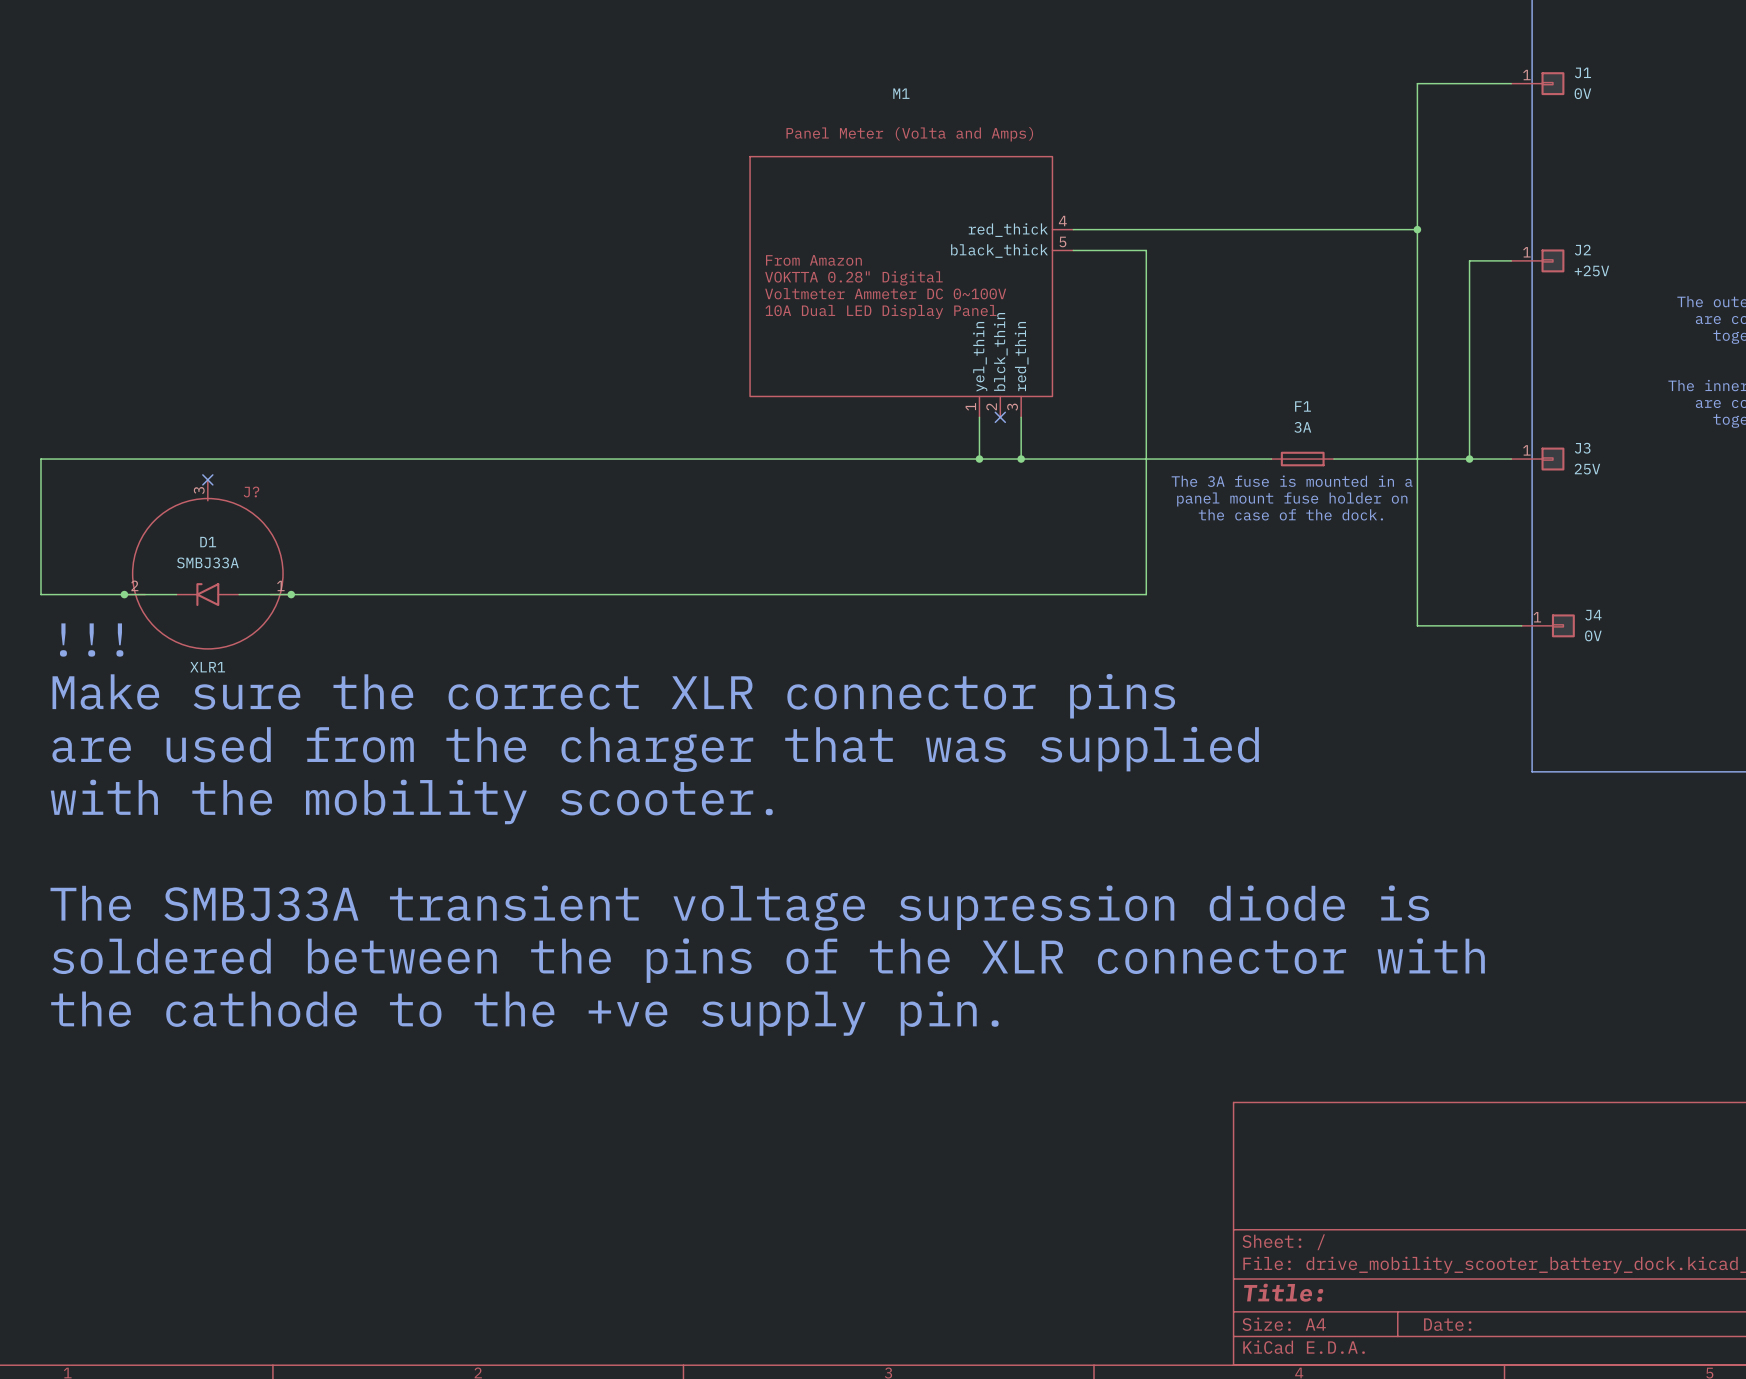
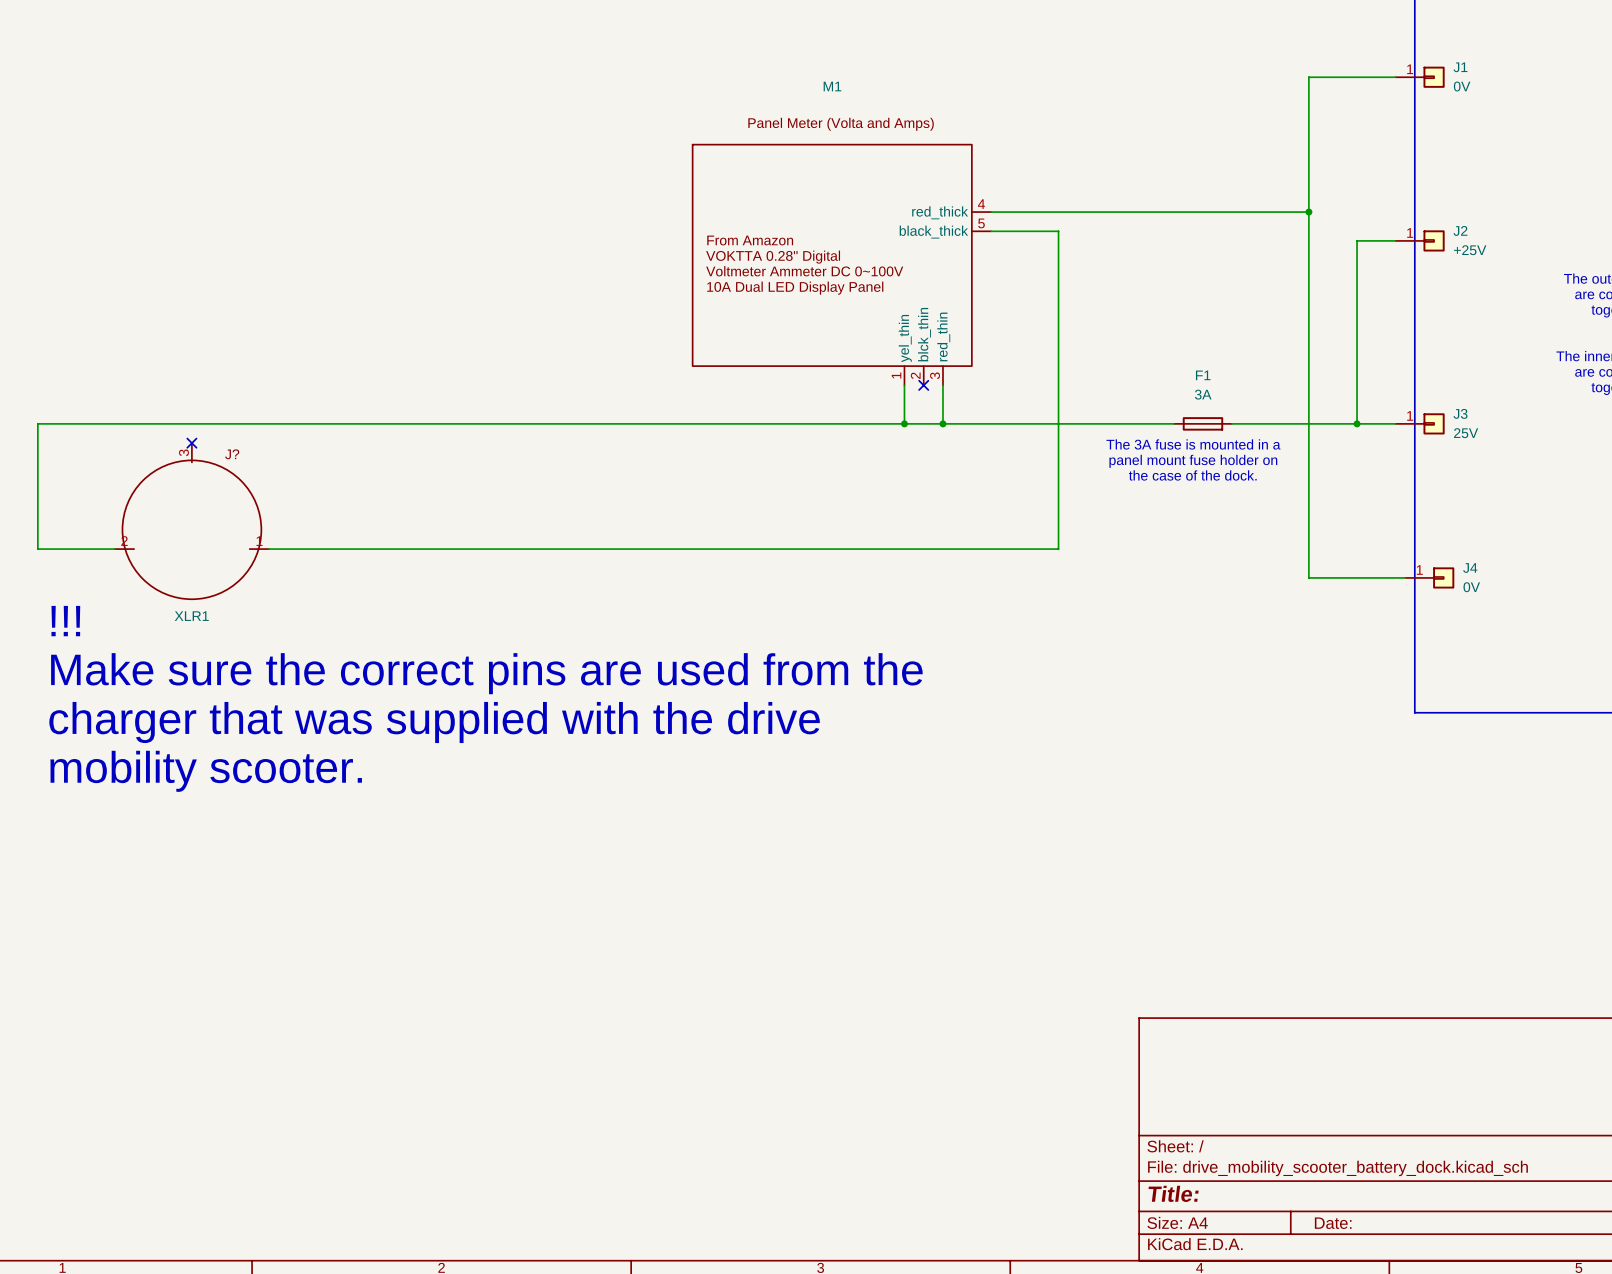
wire: (124, 594) (176, 594) -> none
junction: (124, 594) -> none
D1: SMBJ33A (207, 594) -> none
wire: (239, 594) (291, 594) -> none
junction: (291, 594) -> none
text position: !!! (91, 640) -> !!! (65, 621)
text: Make sure the correct XLR connector pins (613, 696) -> Make sure the correct pins are used from the (486, 673)
text: are used from the charger that was supplied (655, 749) -> charger that was supplied with the drive (434, 722)
text: with the mobility scooter. (411, 801) -> mobility scooter. (206, 771)
text: The SMBJ33A transient voltage supression diode is (739, 908) -> none
text: soldered between the pins of the XLR connector with (768, 960) -> none
text: the cathode to the +ve supply pin. (524, 1013) -> none

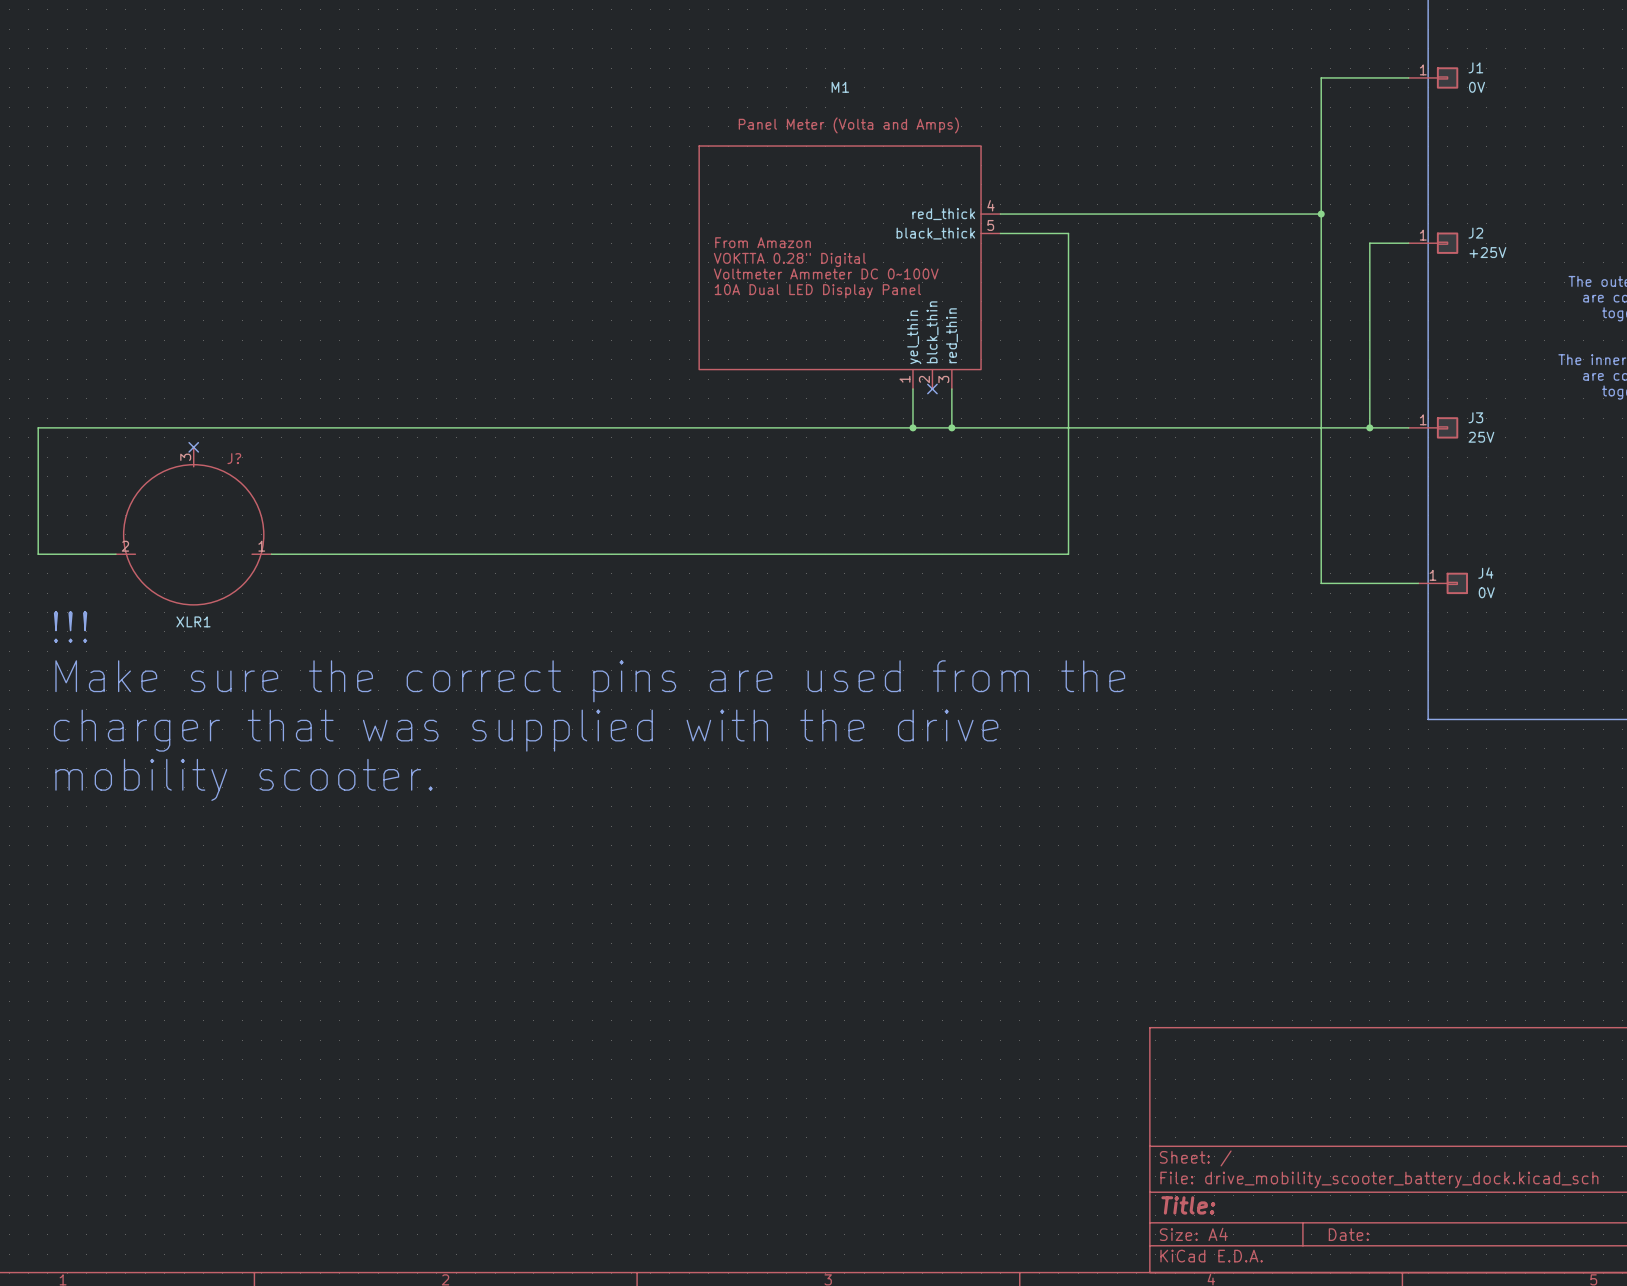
F1: 3A (1202, 423) -> none
text: The 3A fuse is mounted in a (1193, 444) -> none
text: panel mount fuse holder on (1193, 461) -> none
text: the case of the dock. (1192, 475) -> none

